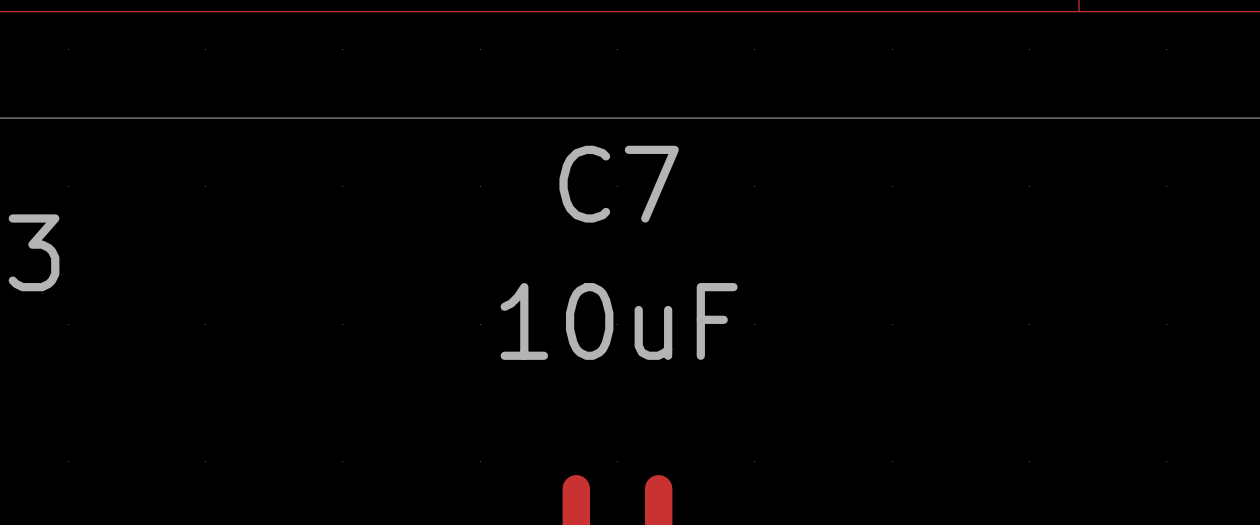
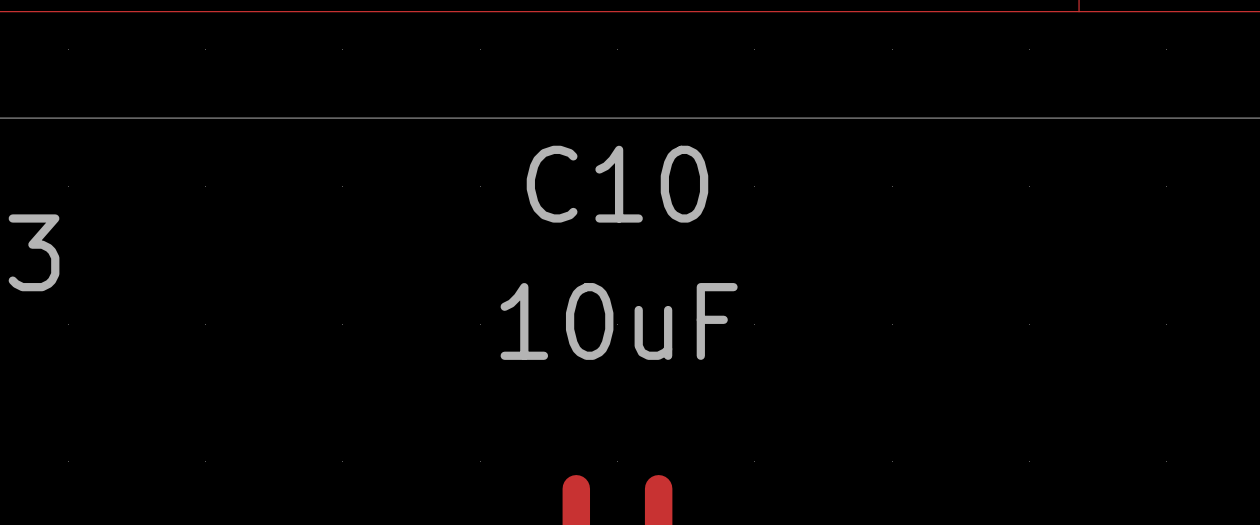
C7 name: C7 (619, 184) -> C10 (617, 184)

